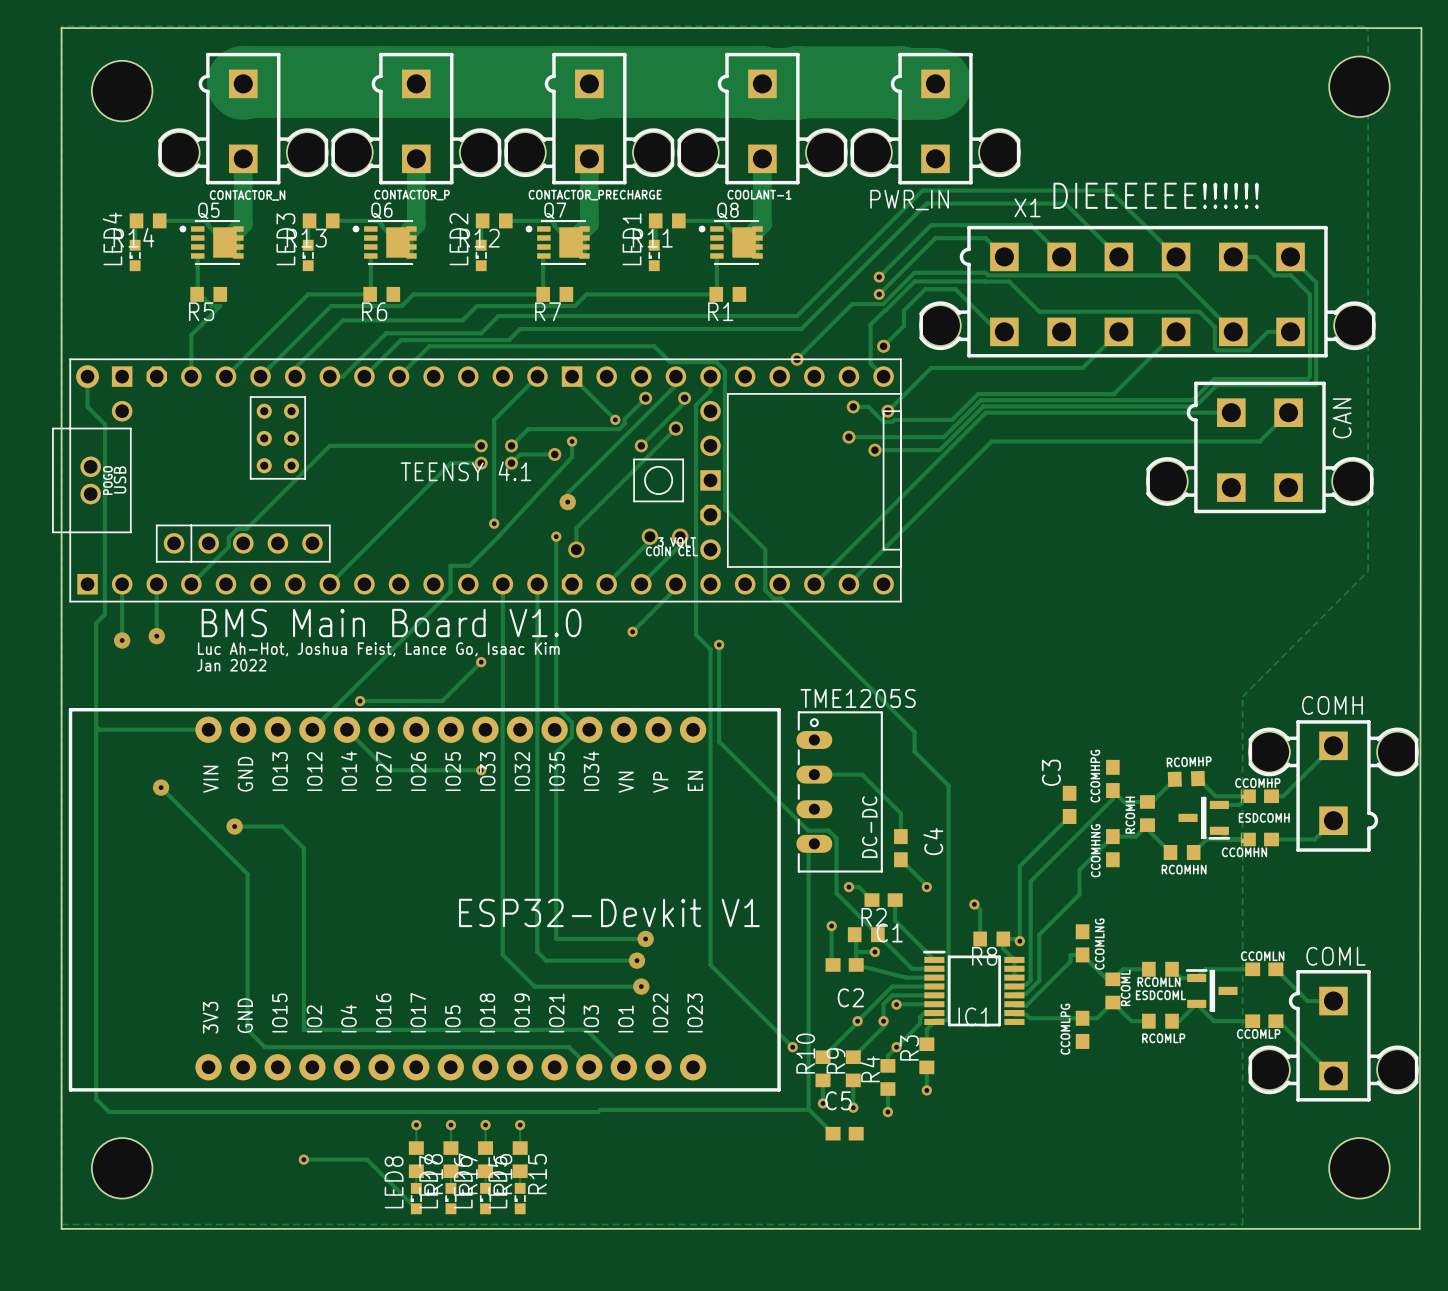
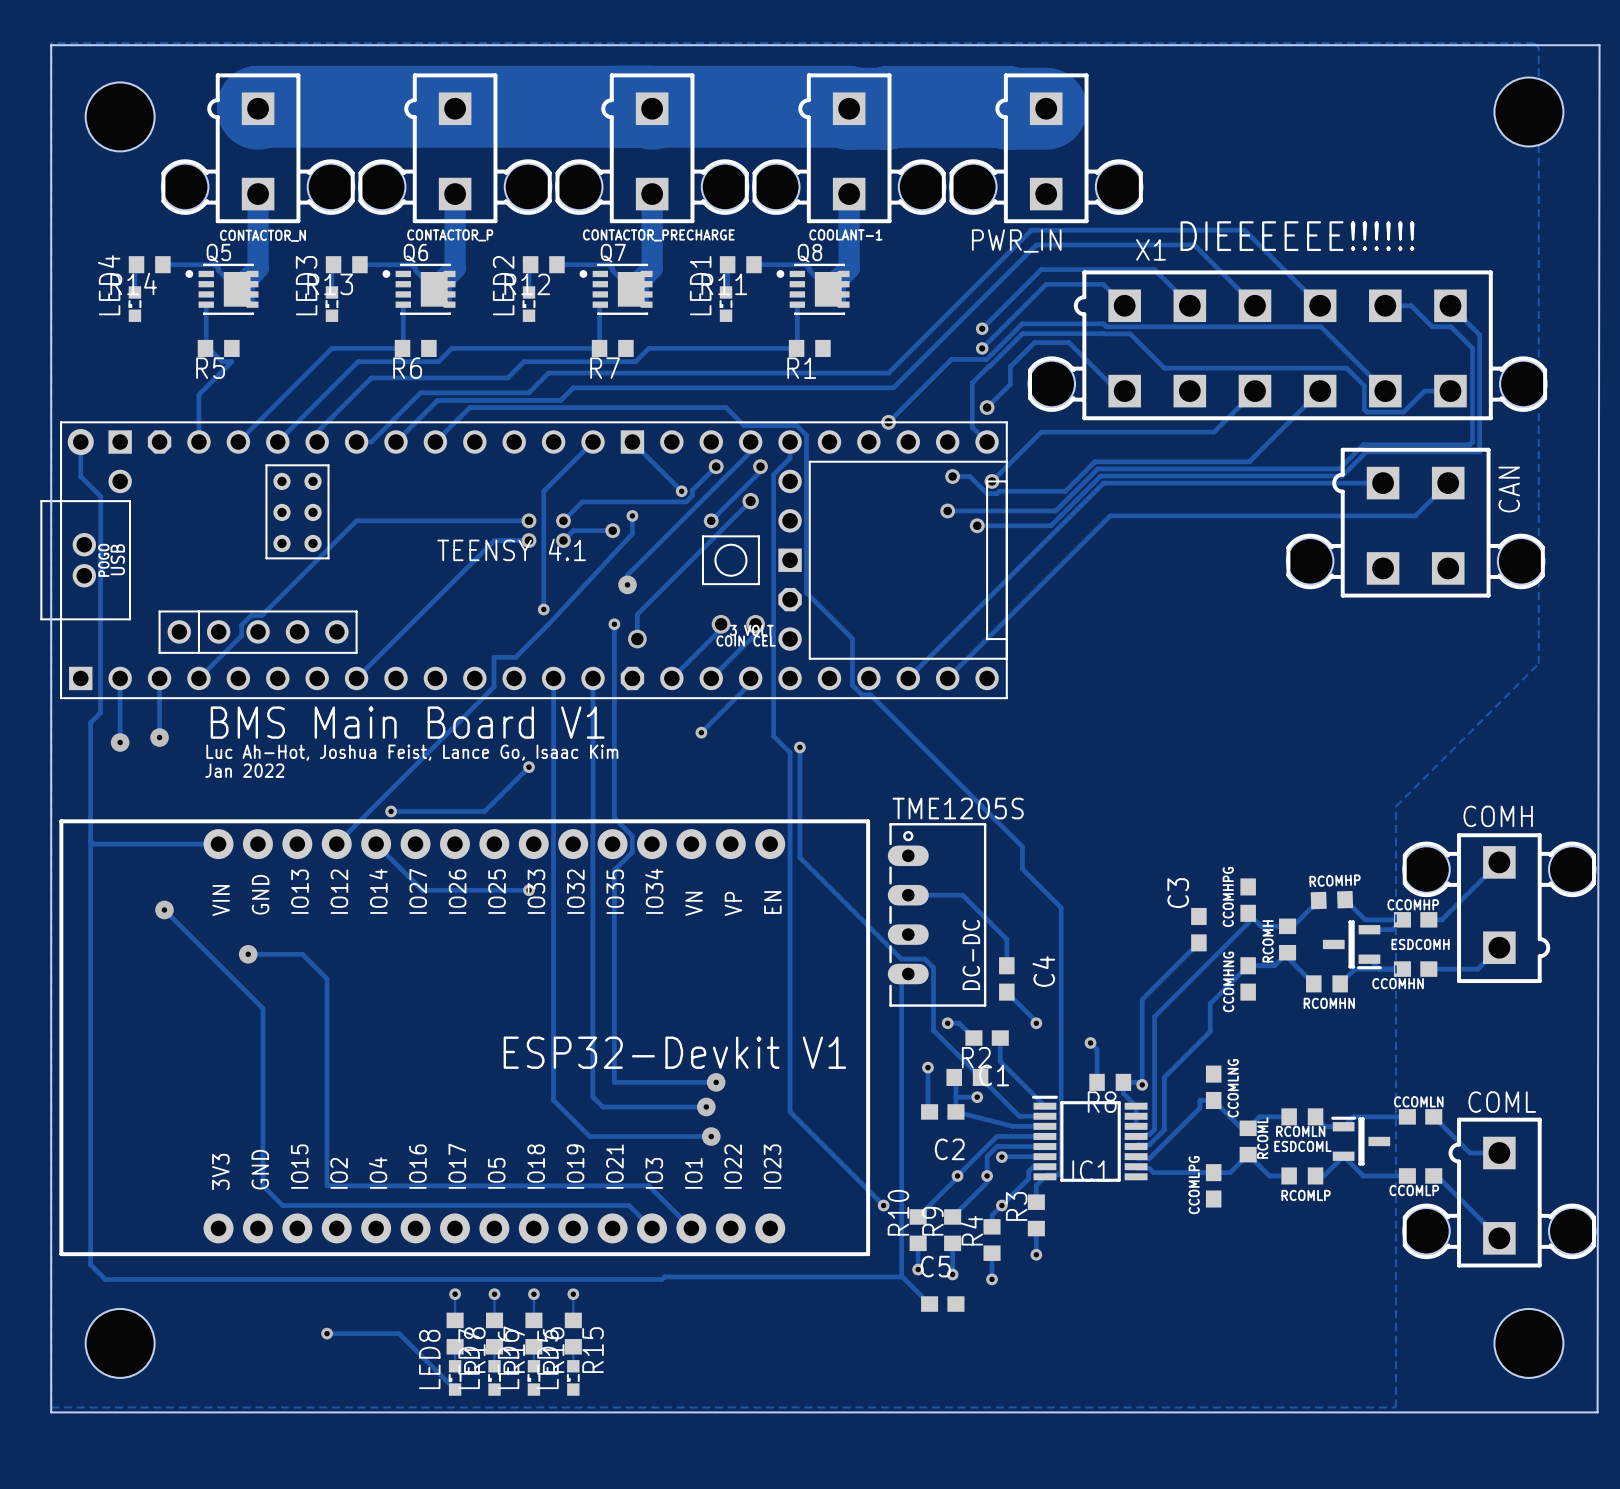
text: BMS Main Board V1.0 (391, 623) -> BMS Main Board V1 (407, 722)

